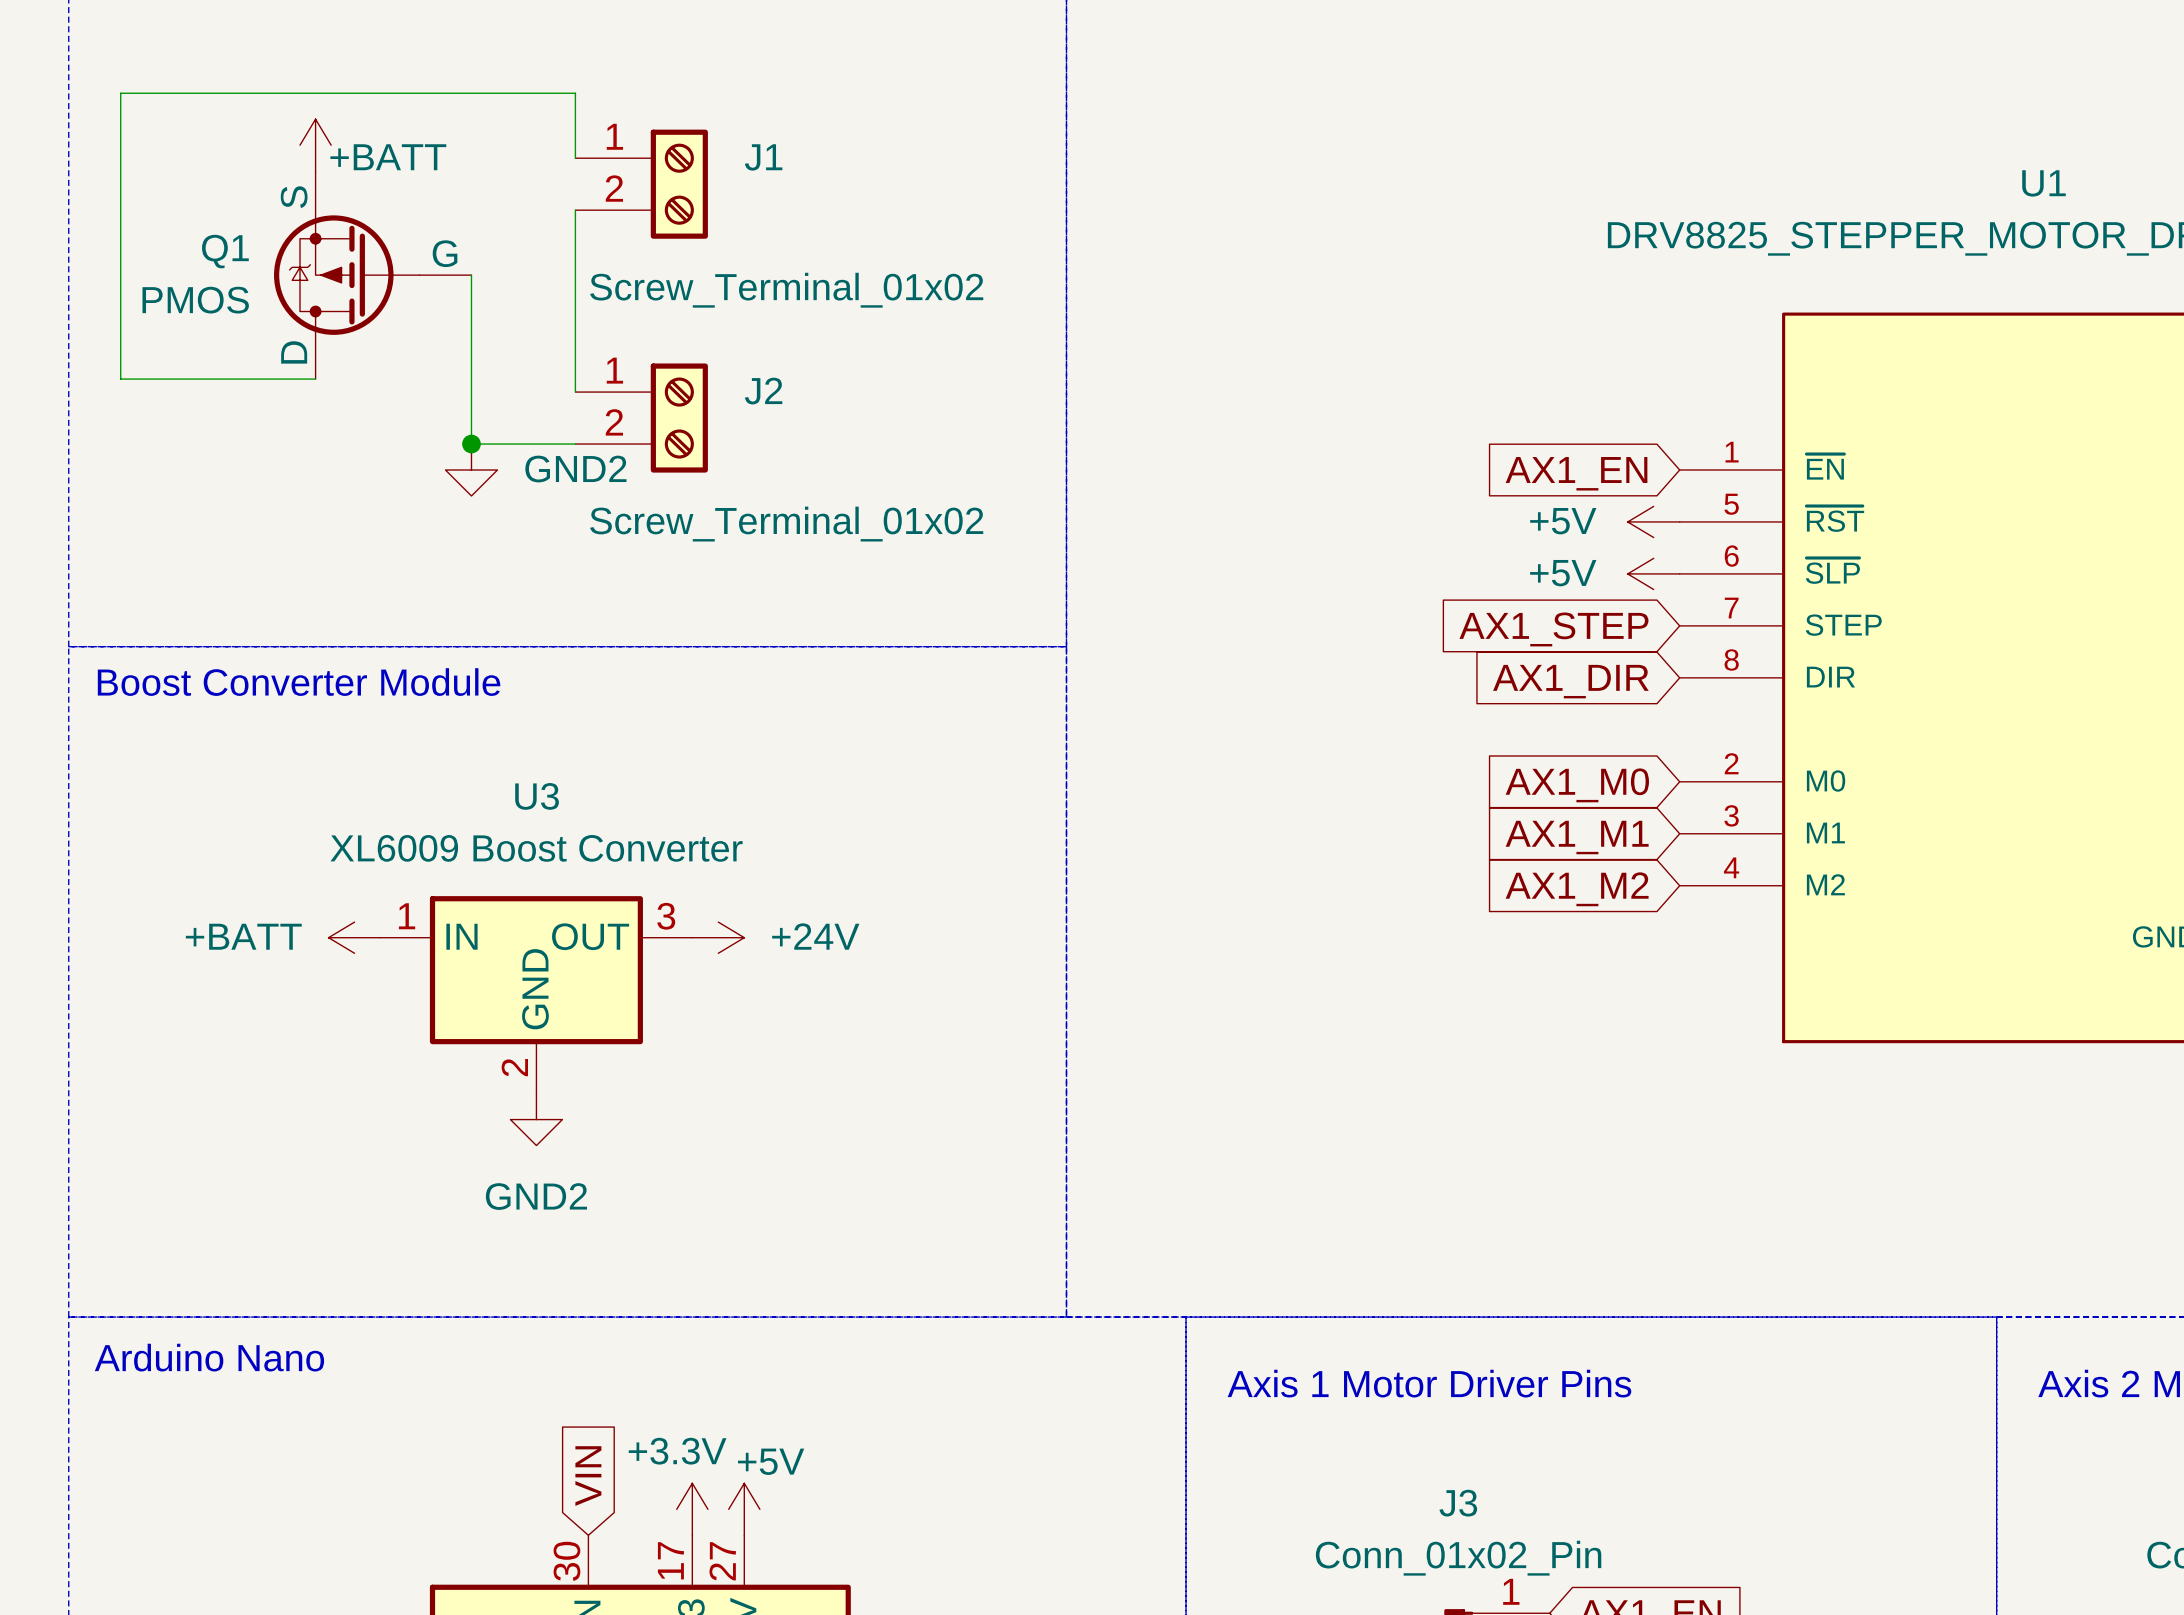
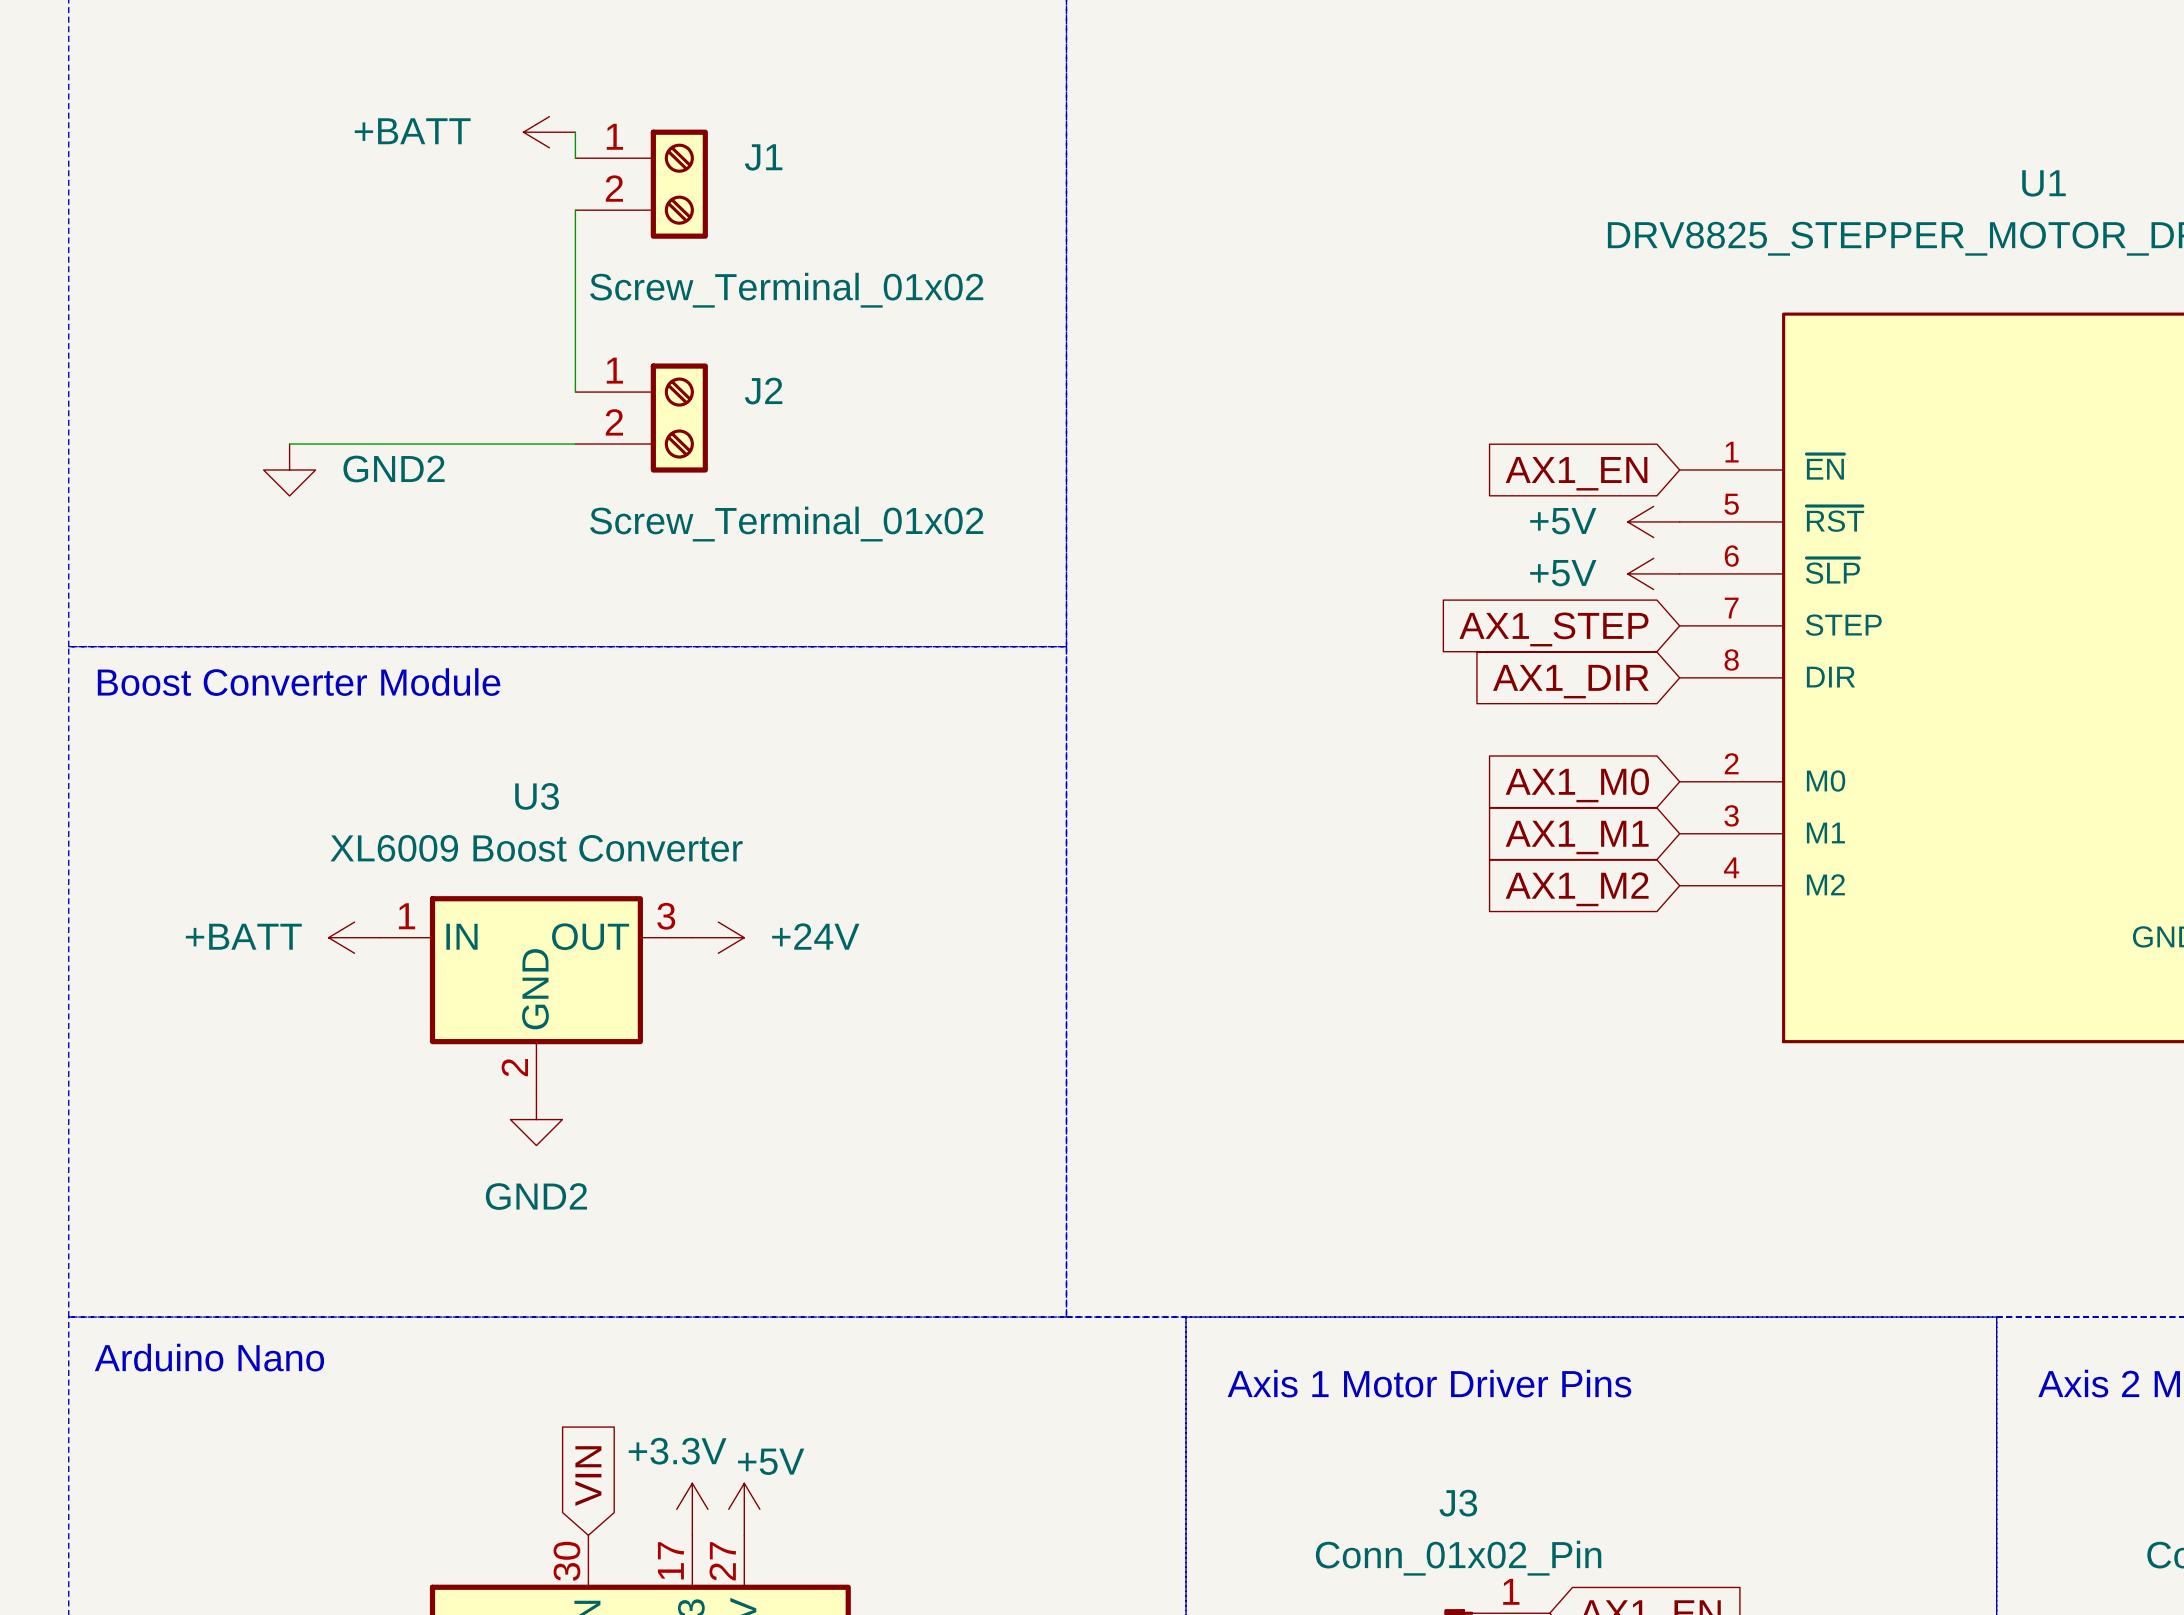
wire: (575, 132) (575, 93) (120, 93) (120, 379) (315, 379) -> none
power symbol rotation: 0° (315, 145) -> 90° counterclockwise (549, 132)
power symbol position: +BATT (315, 145) -> +BATT (549, 132)
power symbol text position: +BATT (388, 157) -> +BATT (412, 131)
Q1: PMOS (372, 275) -> none
wire: (471, 275) (471, 444) -> (289, 444) (471, 444)
junction: (471, 444) -> none
power symbol position: GND2 (471, 470) -> GND2 (289, 470)

